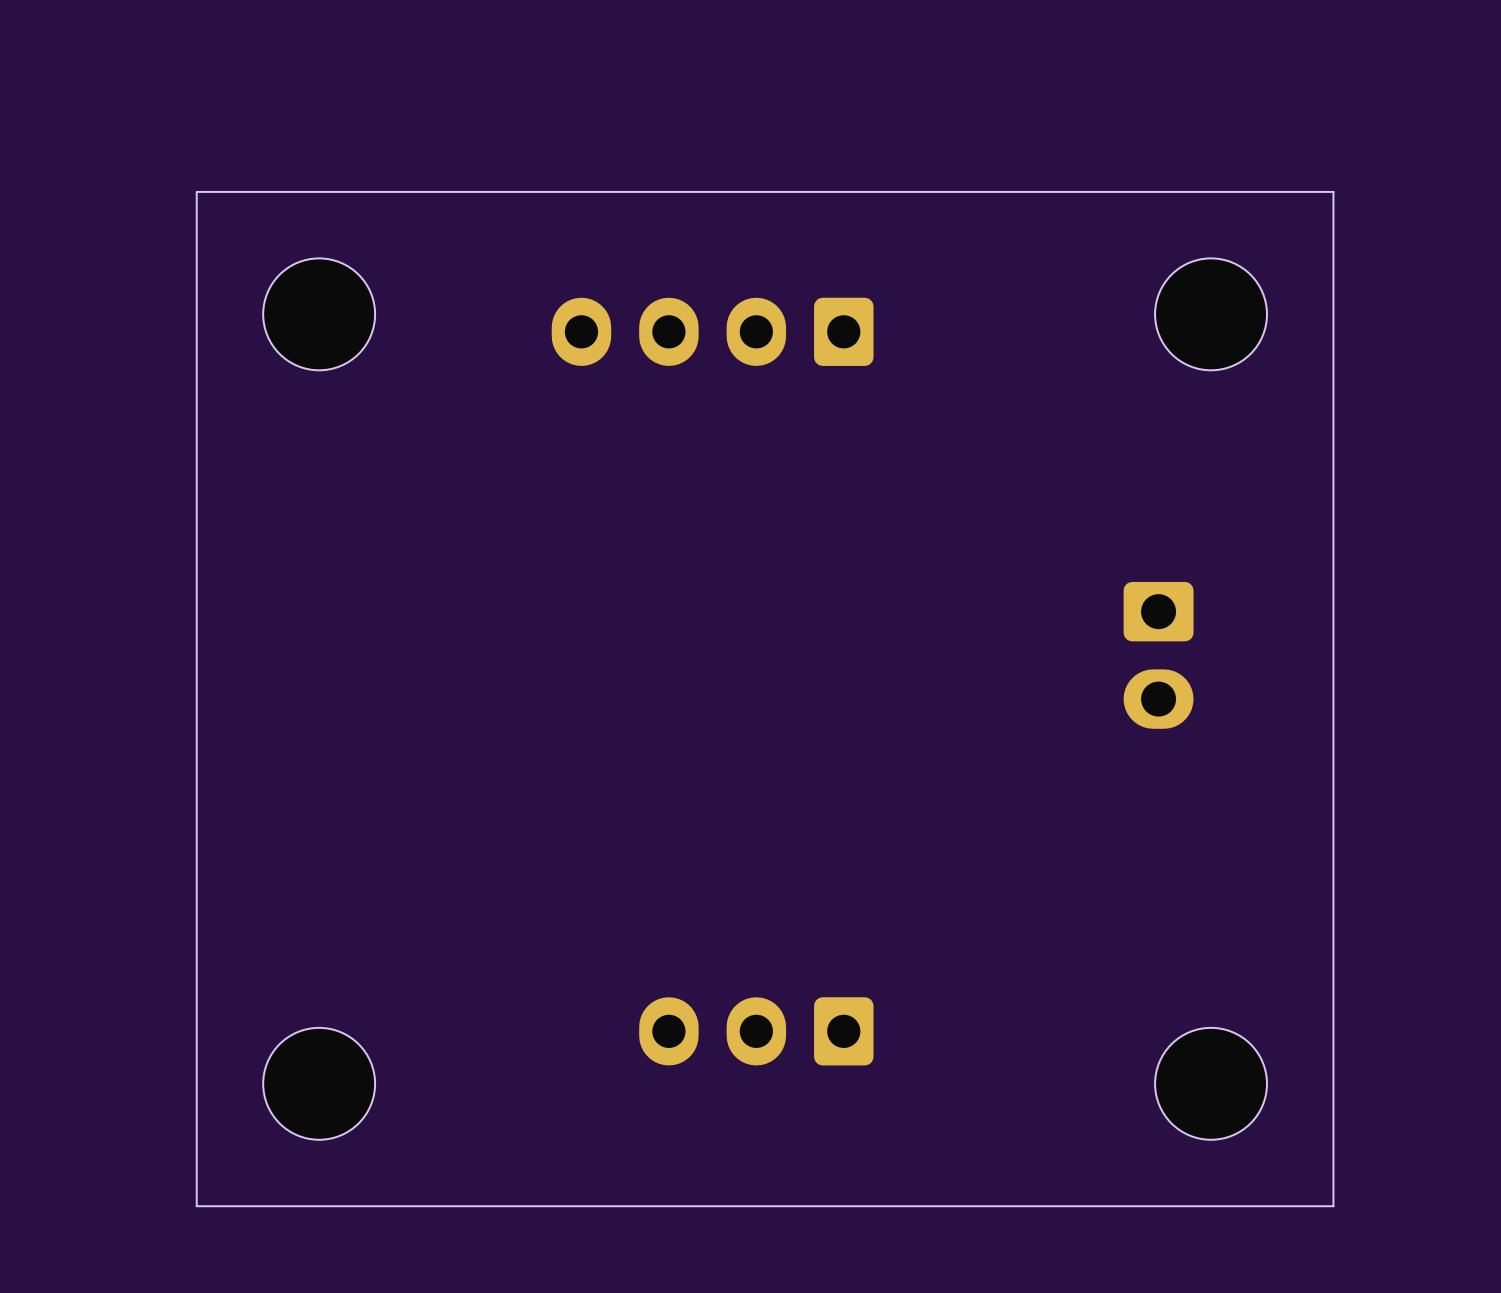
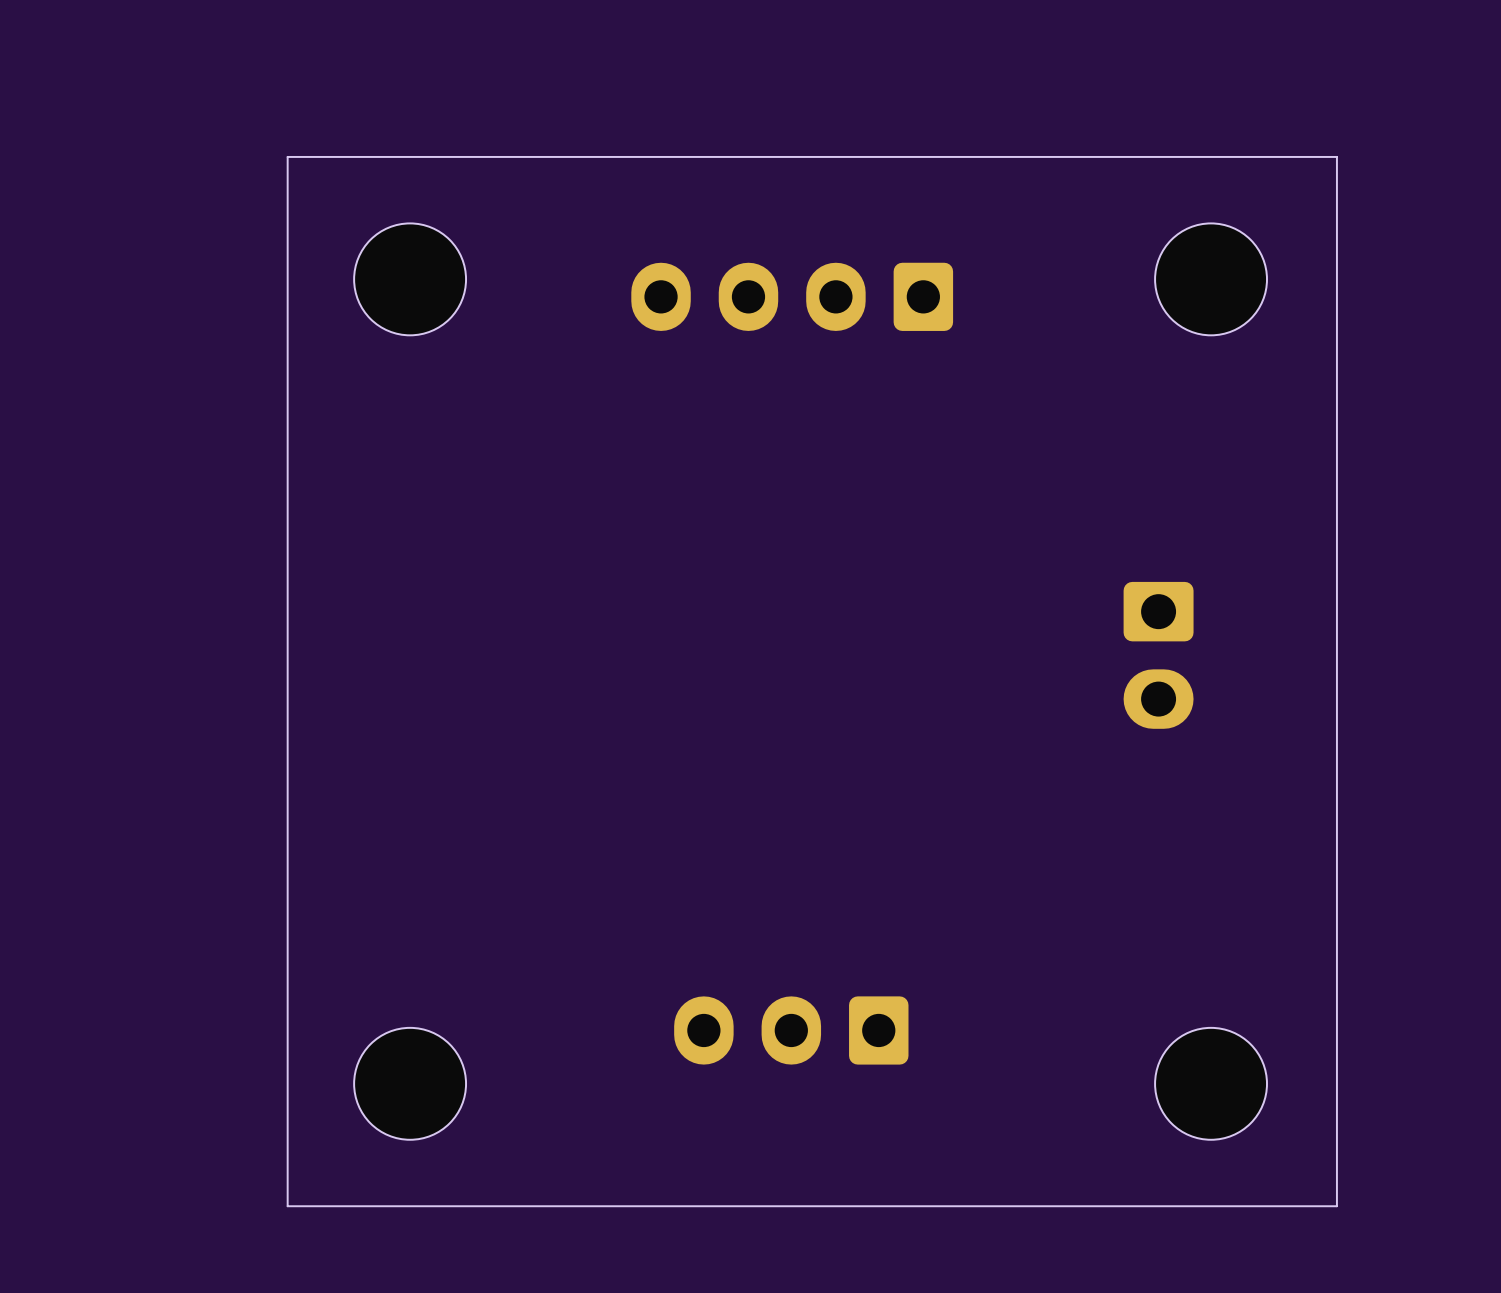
part position: (319, 314) -> (410, 279)
part position: (1211, 314) -> (1211, 279)
part position: (712, 331) -> (792, 296)
part position: (756, 1031) -> (791, 1030)
part position: (319, 1083) -> (410, 1083)
board edge: (1333, 1206) (1333, 191) (196, 191) (196, 1206) (287, 1206) -> (1333, 1206) (1336, 1206) (1336, 156) (287, 156) (287, 1206)

